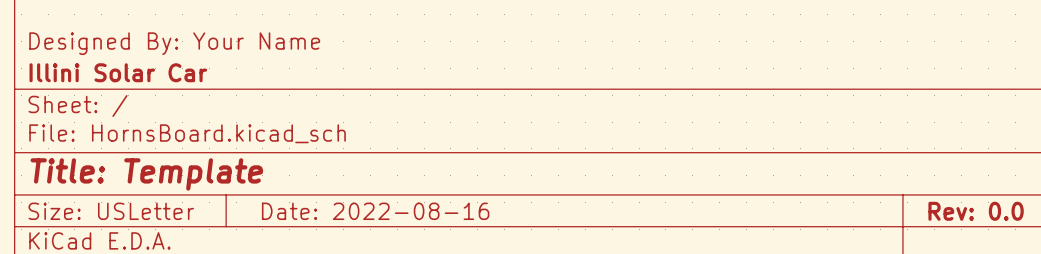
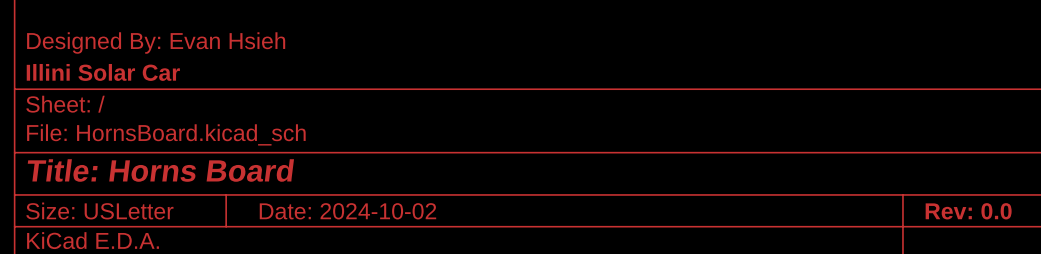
title block: Designed By: Your Name (174, 43) -> Designed By: Evan Hsieh (156, 43)
title block: Title: Template (146, 174) -> Title: Horns Board (160, 170)
title block: Date: 2022-08-16 (375, 211) -> Date: 2024-10-02 (347, 211)

